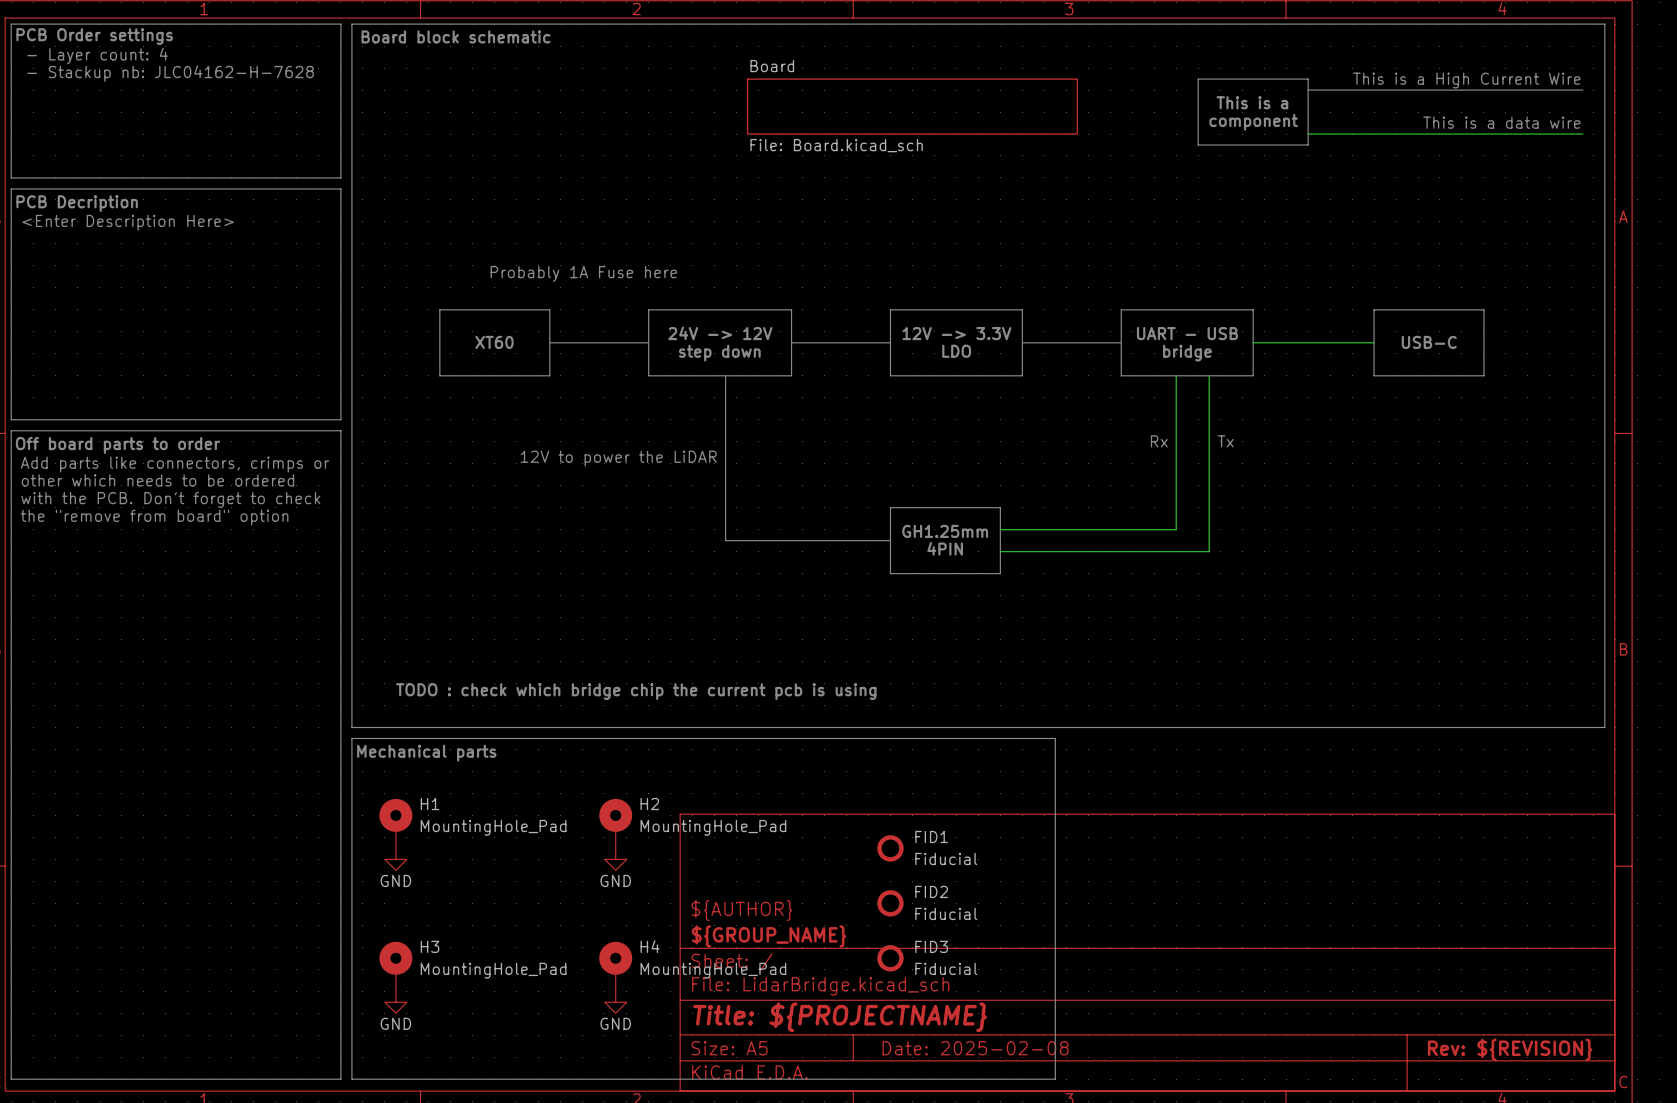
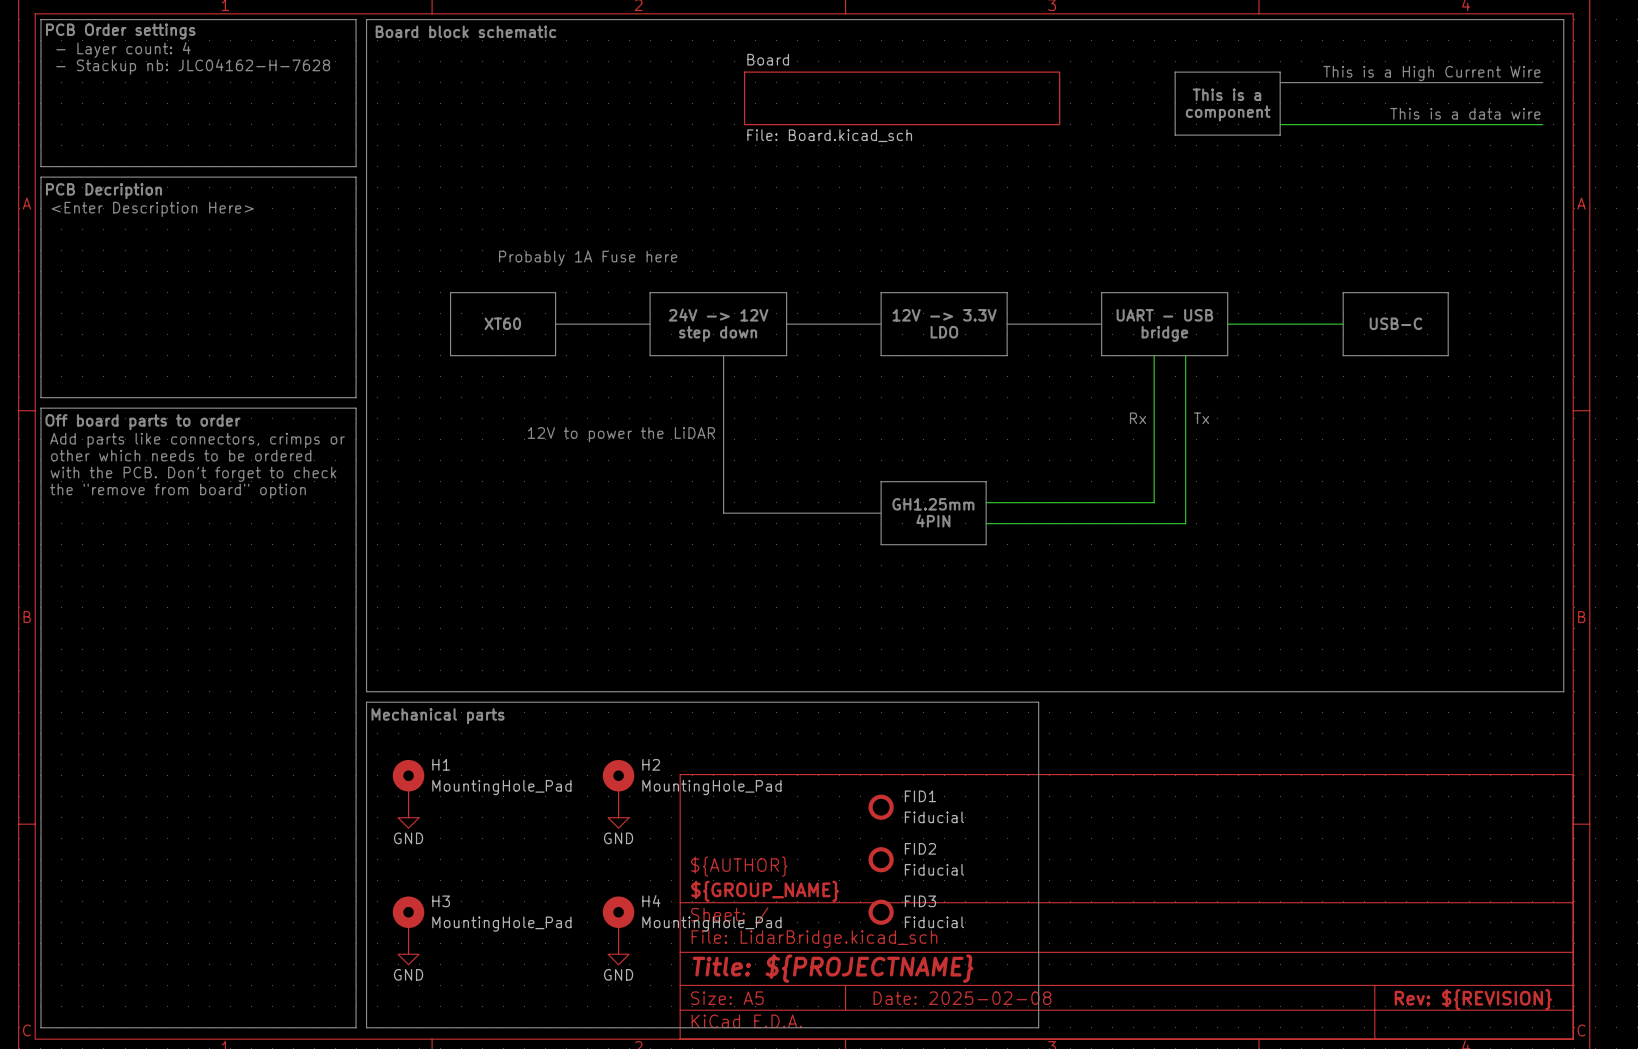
text: TODO : check which bridge chip the current pcb is using (636, 691) -> none

